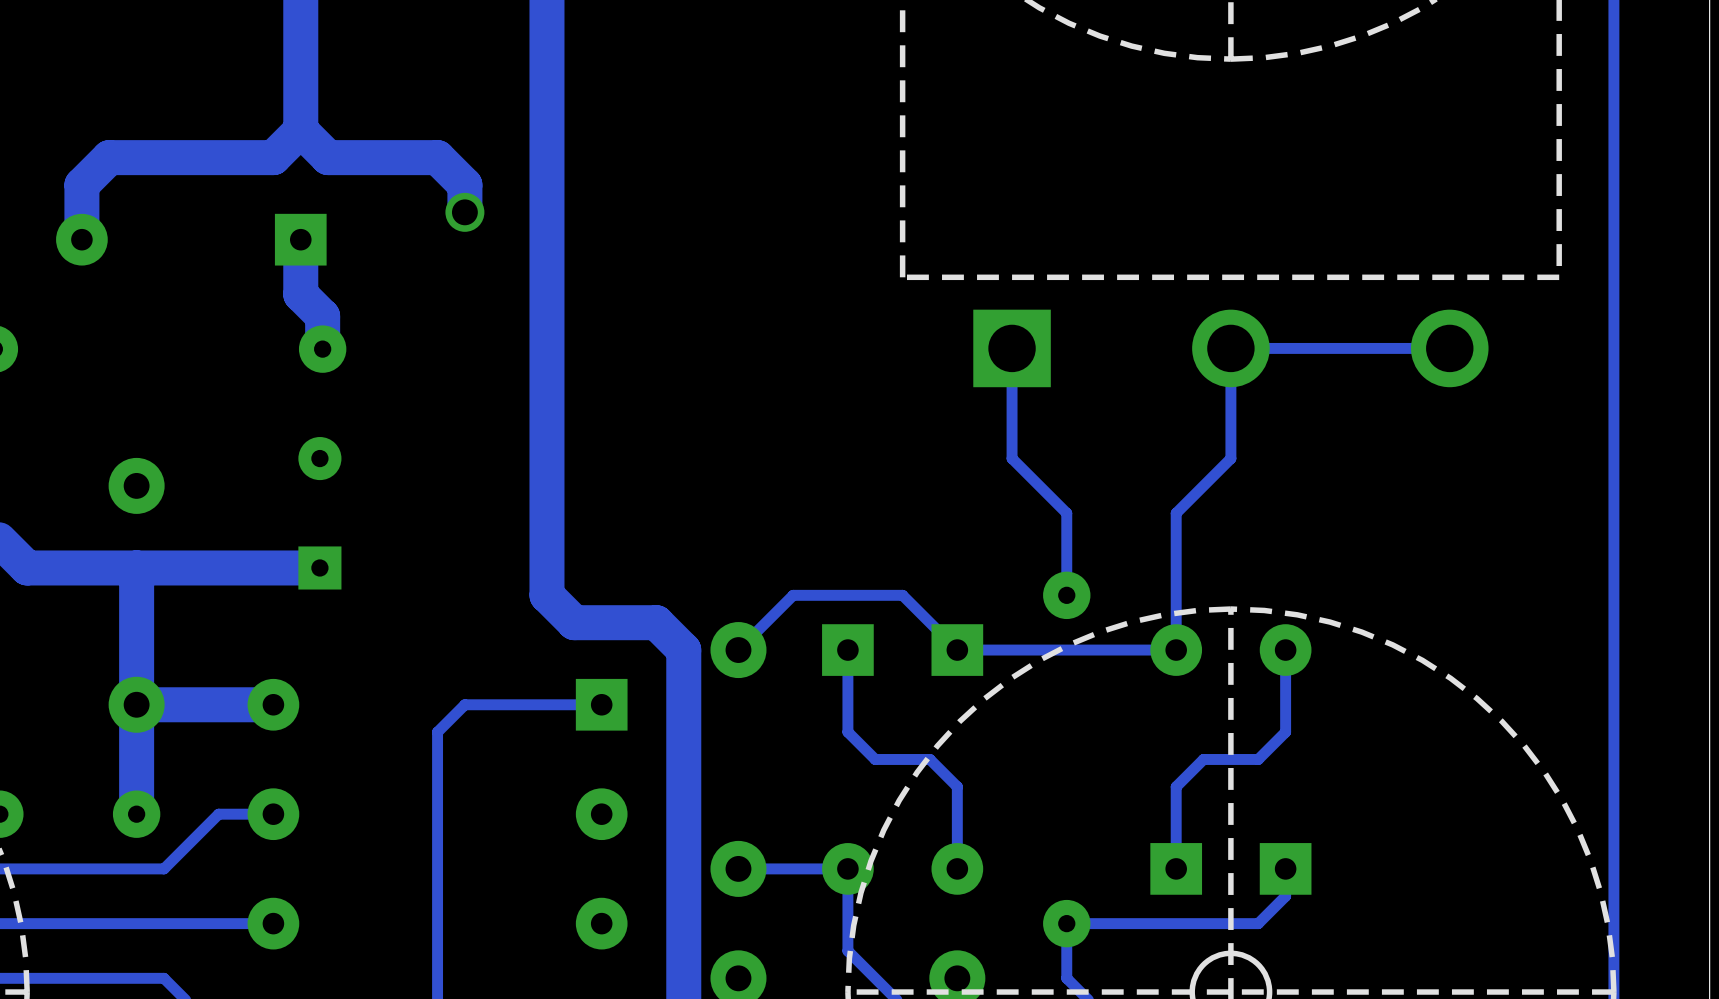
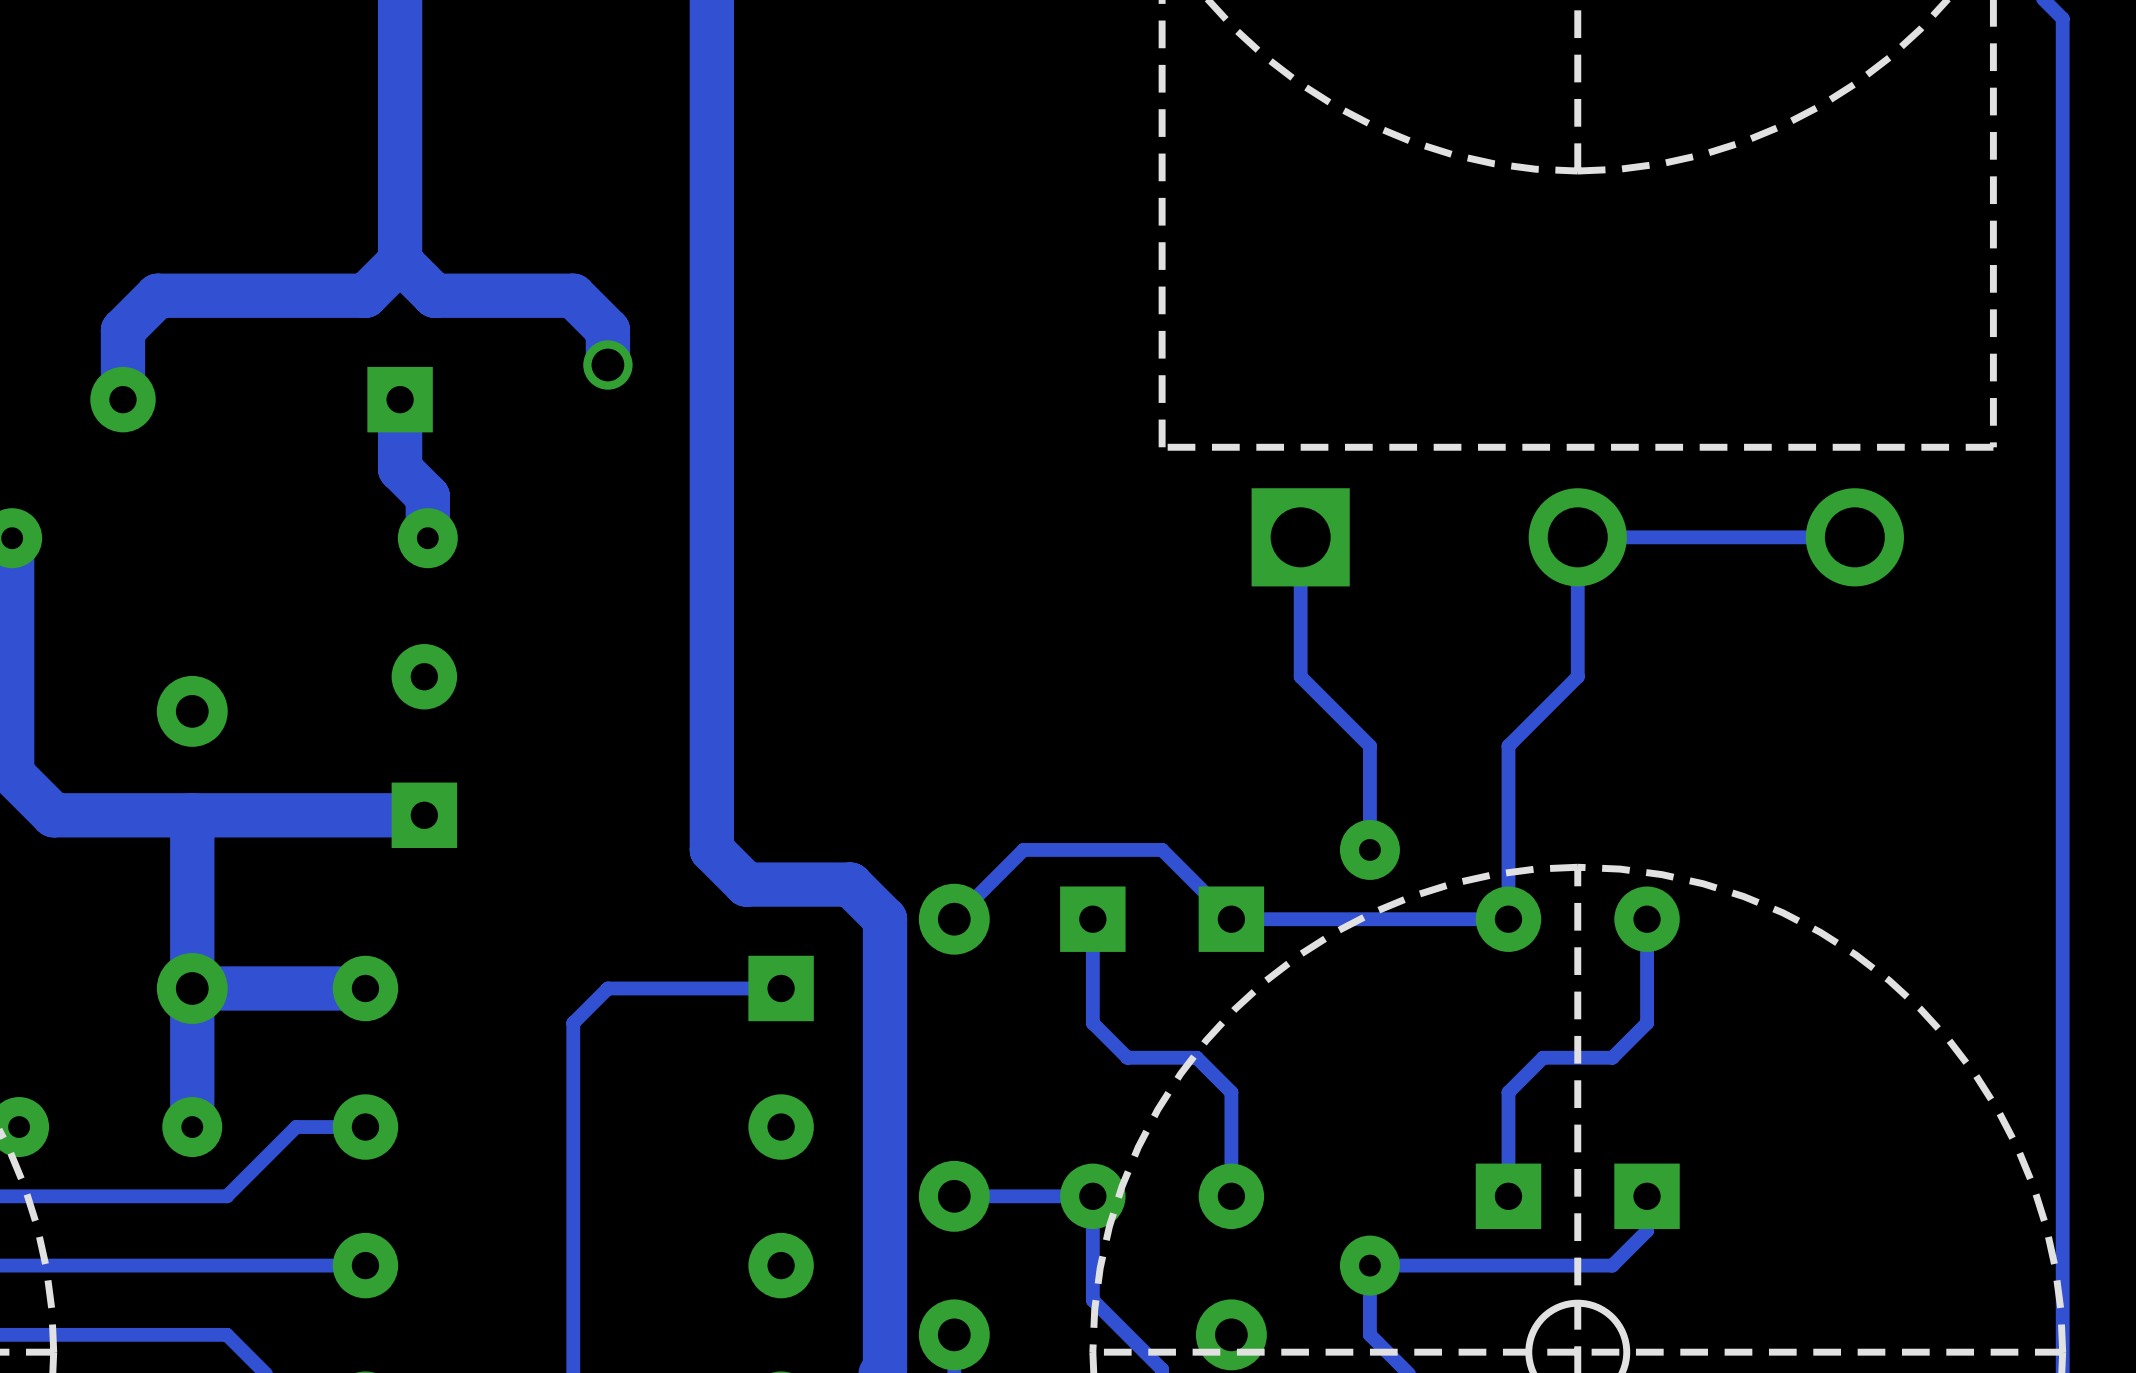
part footprint: [298, 437, 342, 590] -> [391, 644, 458, 849]

